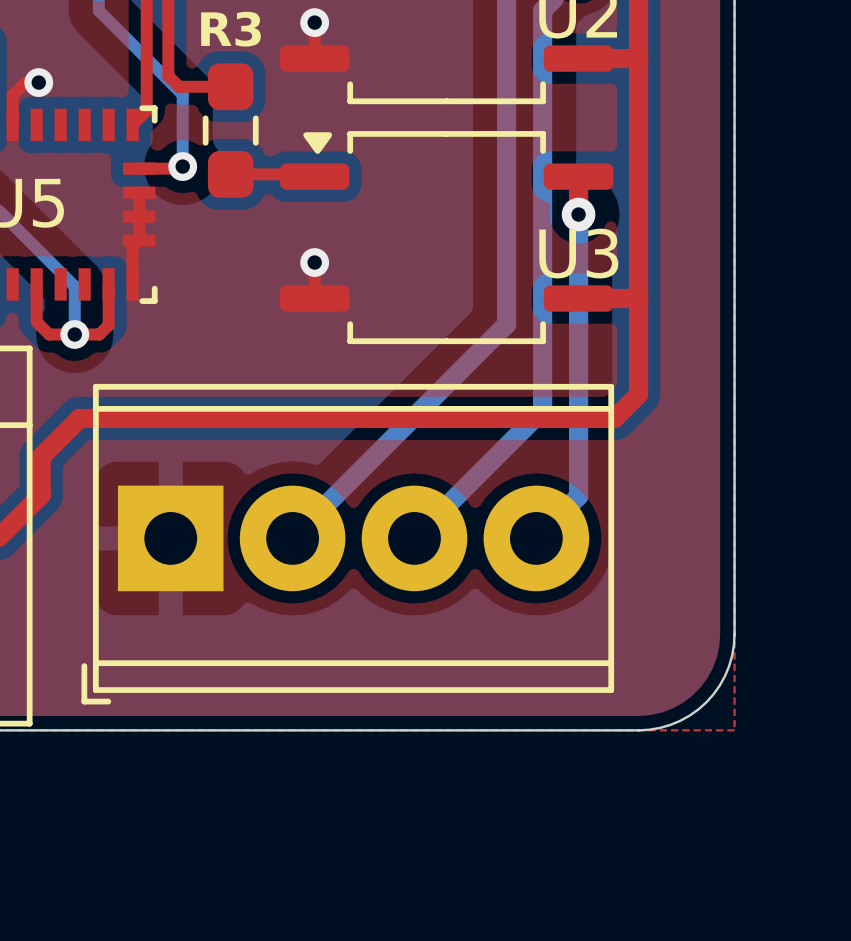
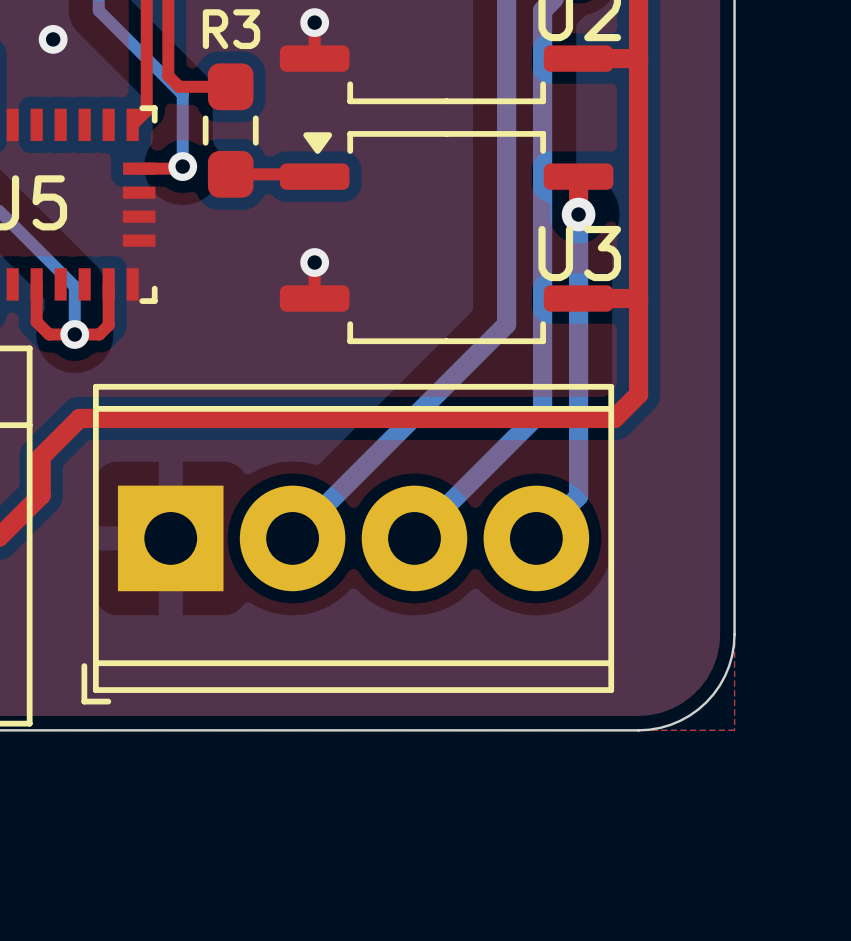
top track: (38, 82) (25, 82) (12, 95) (12, 124) -> none
via position: (38, 82) -> (53, 39)
top track: (139, 192) (139, 240) (132, 247) (132, 284) -> none

